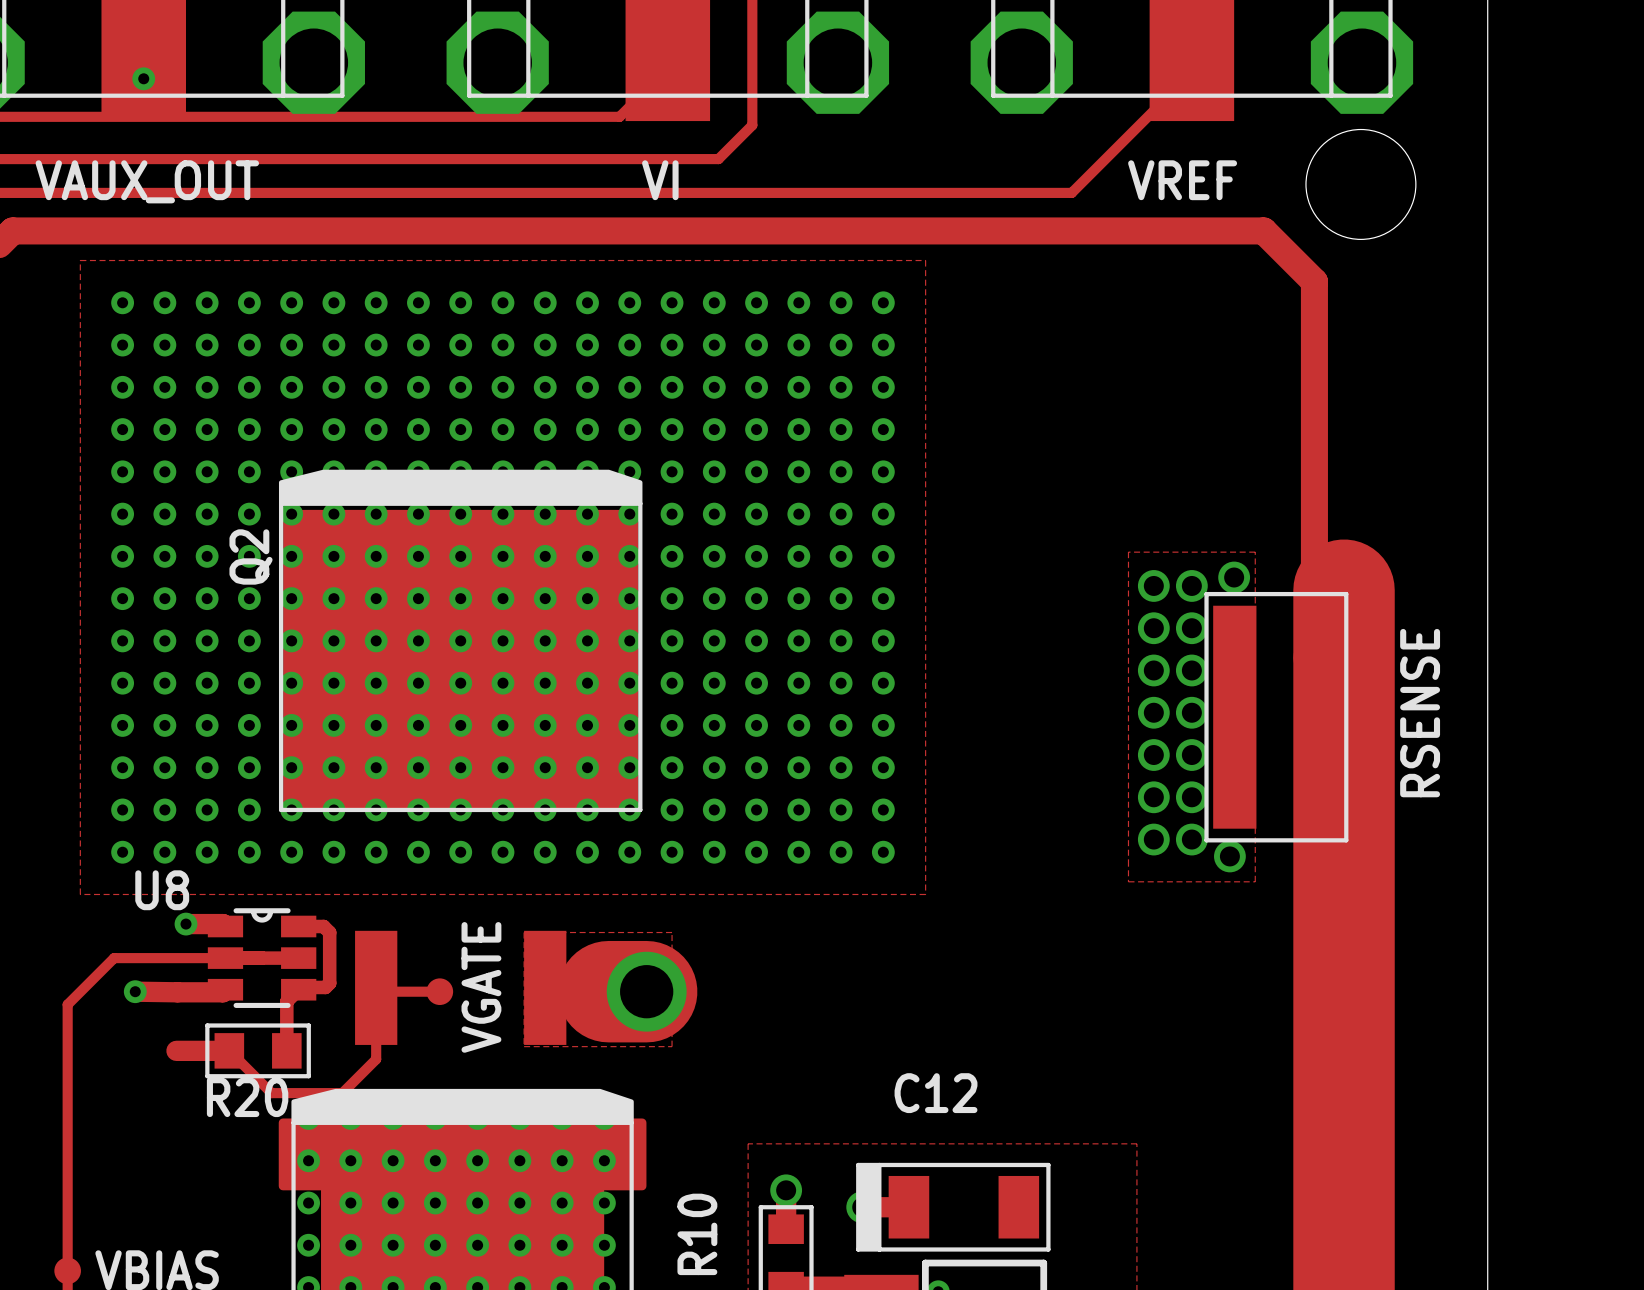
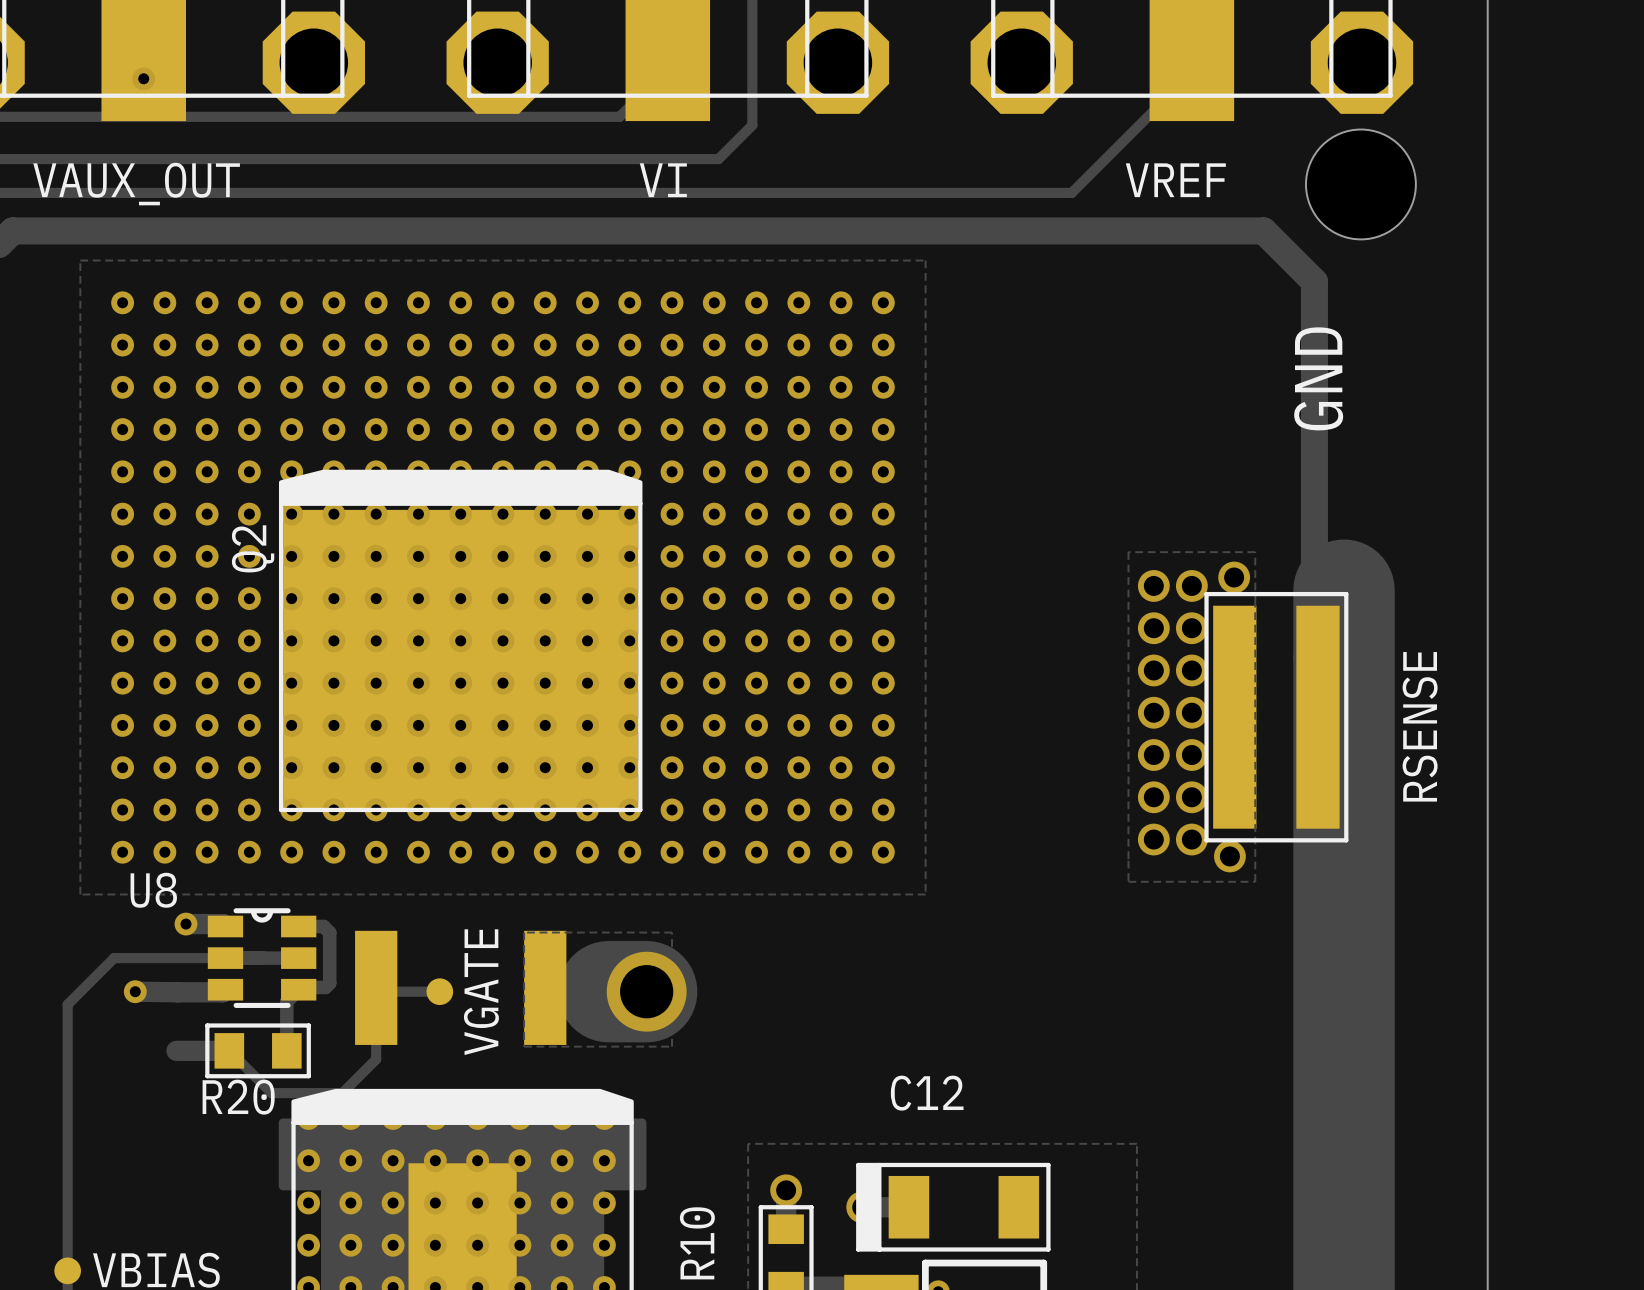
text: none -> GND (1318, 378)

